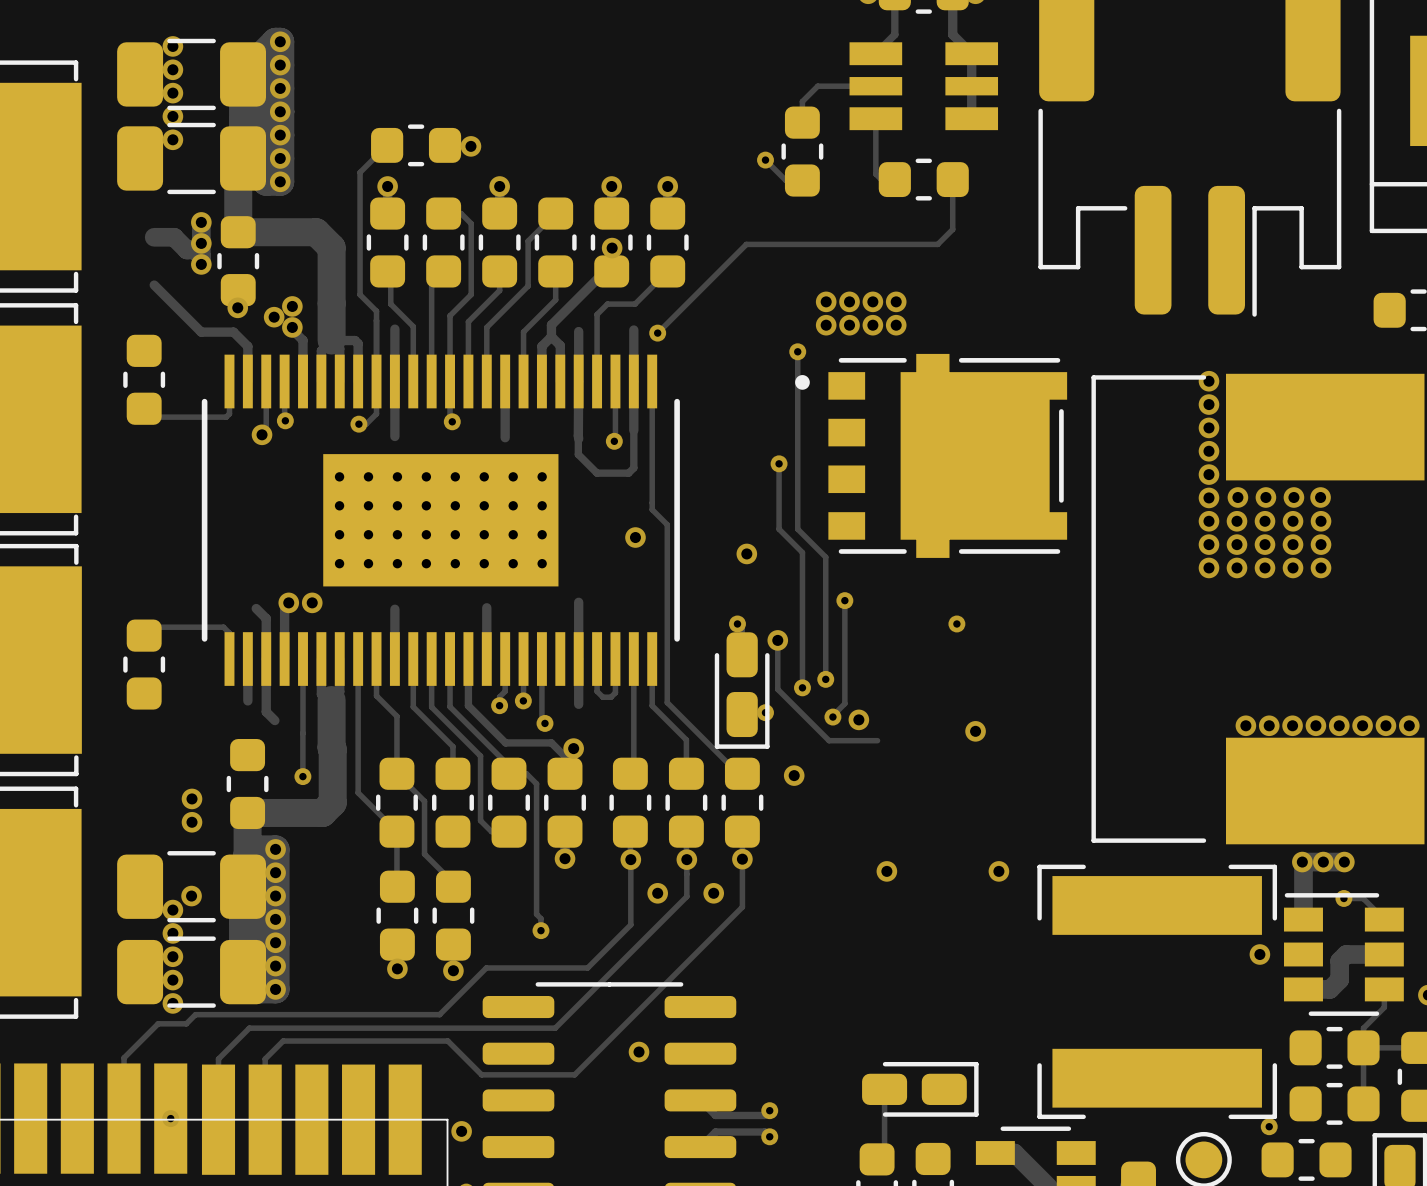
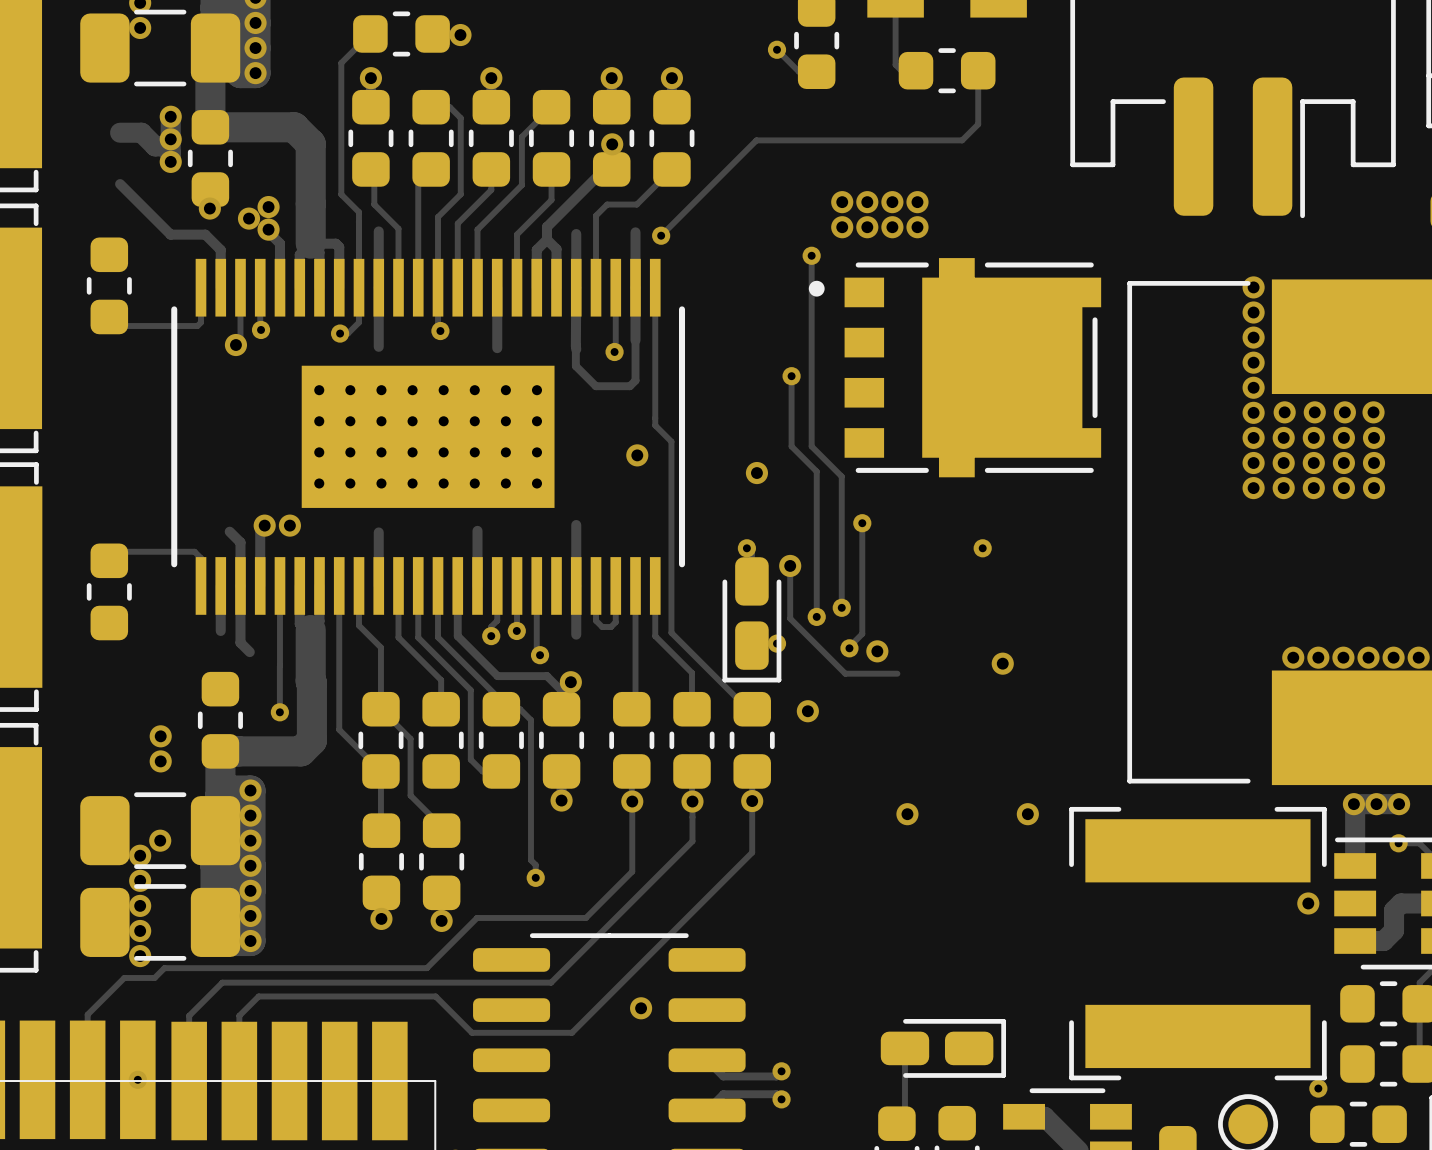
via: (657, 893) -> none
via: (713, 893) -> none
via: (461, 1131) -> none

